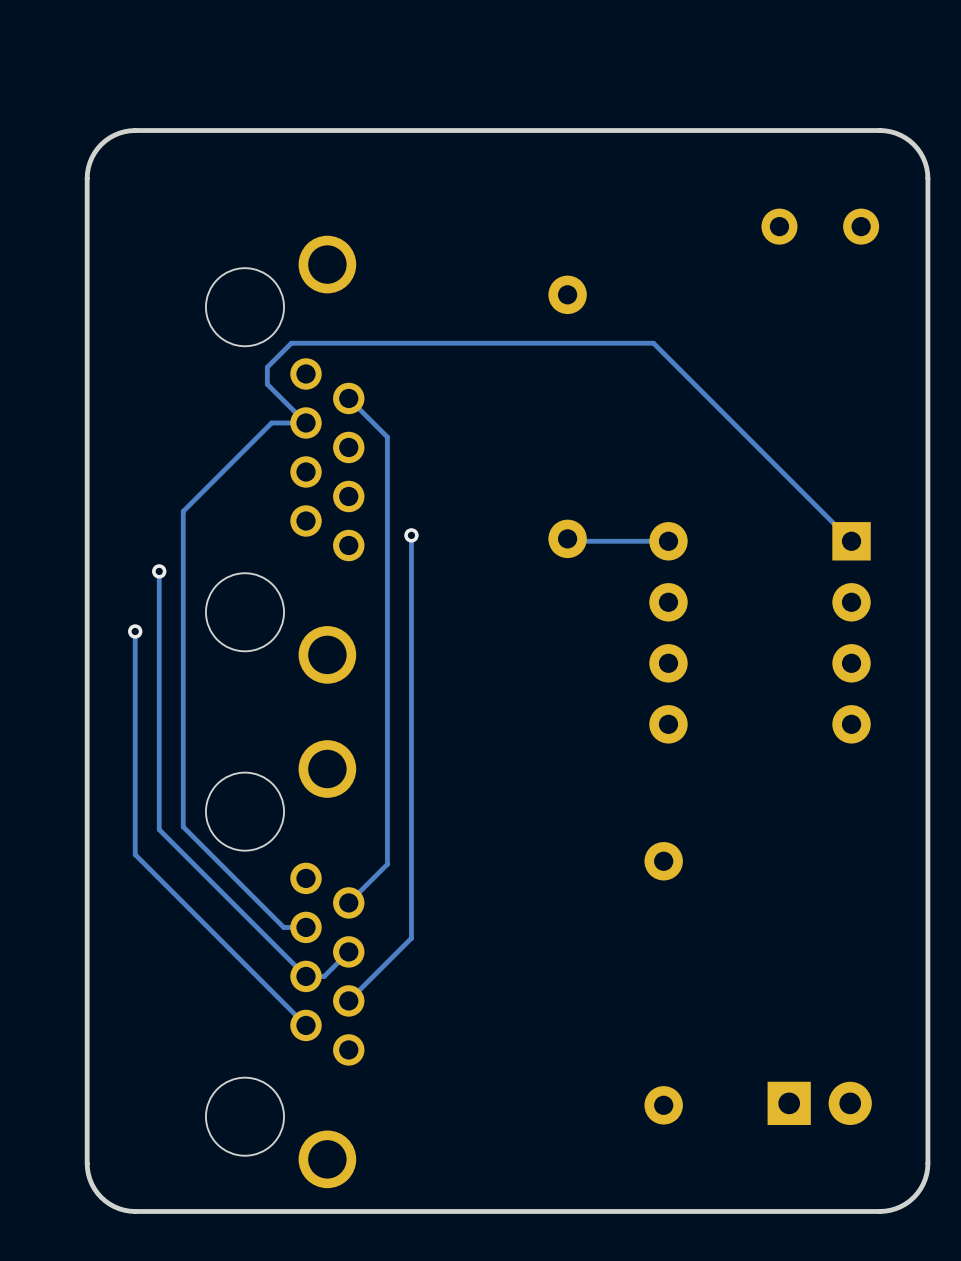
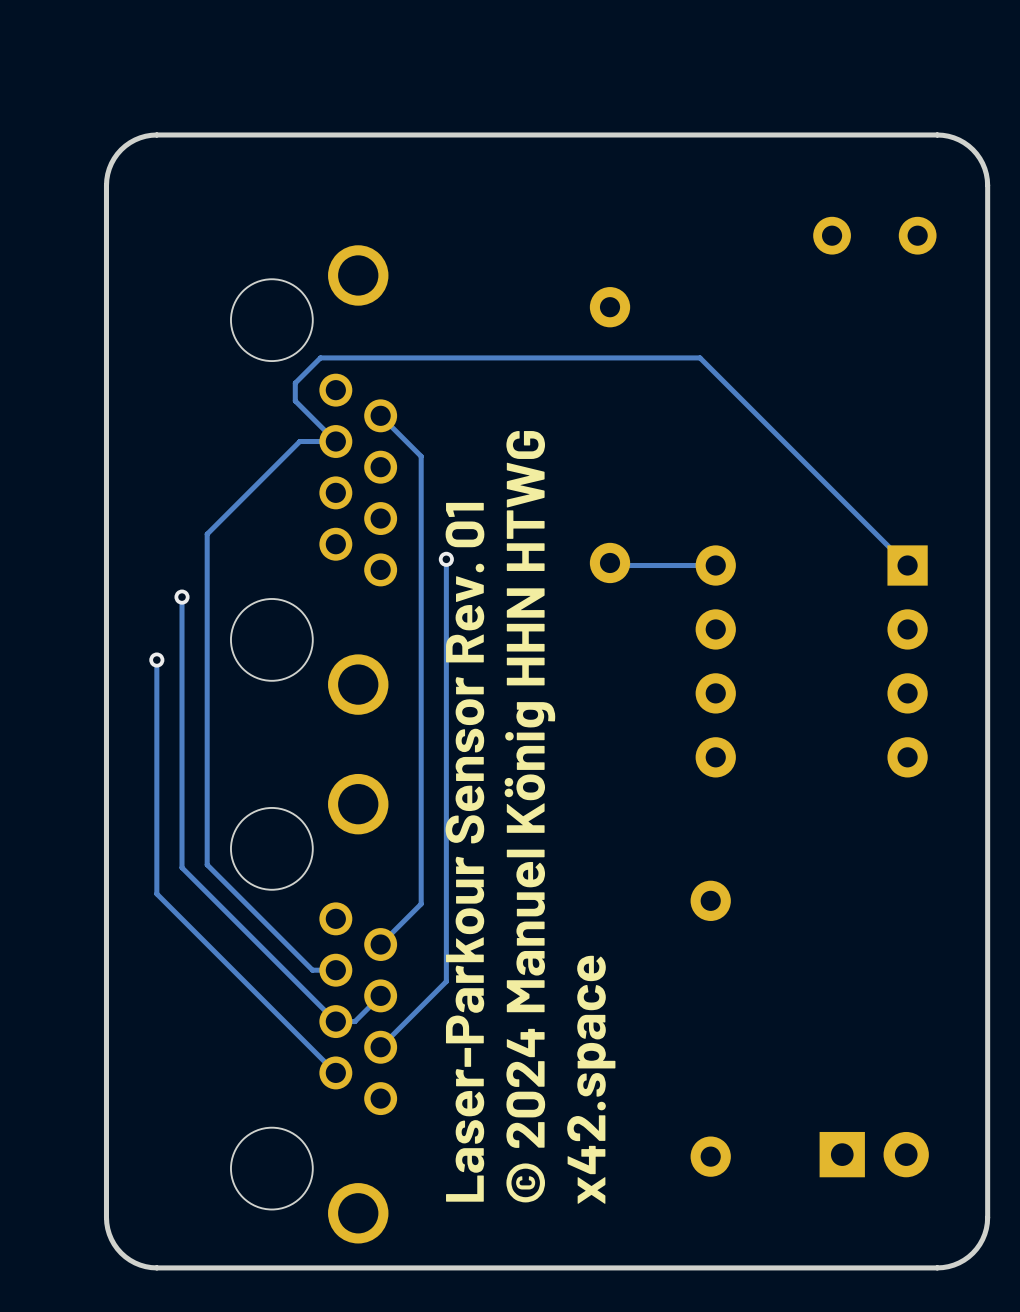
text: none -> © 2024 Manuel König HHN HTWG (529, 816)
text: none -> Laser-Parkour Sensor Rev. 01 (464, 852)
text: none -> x42.space (591, 1079)

